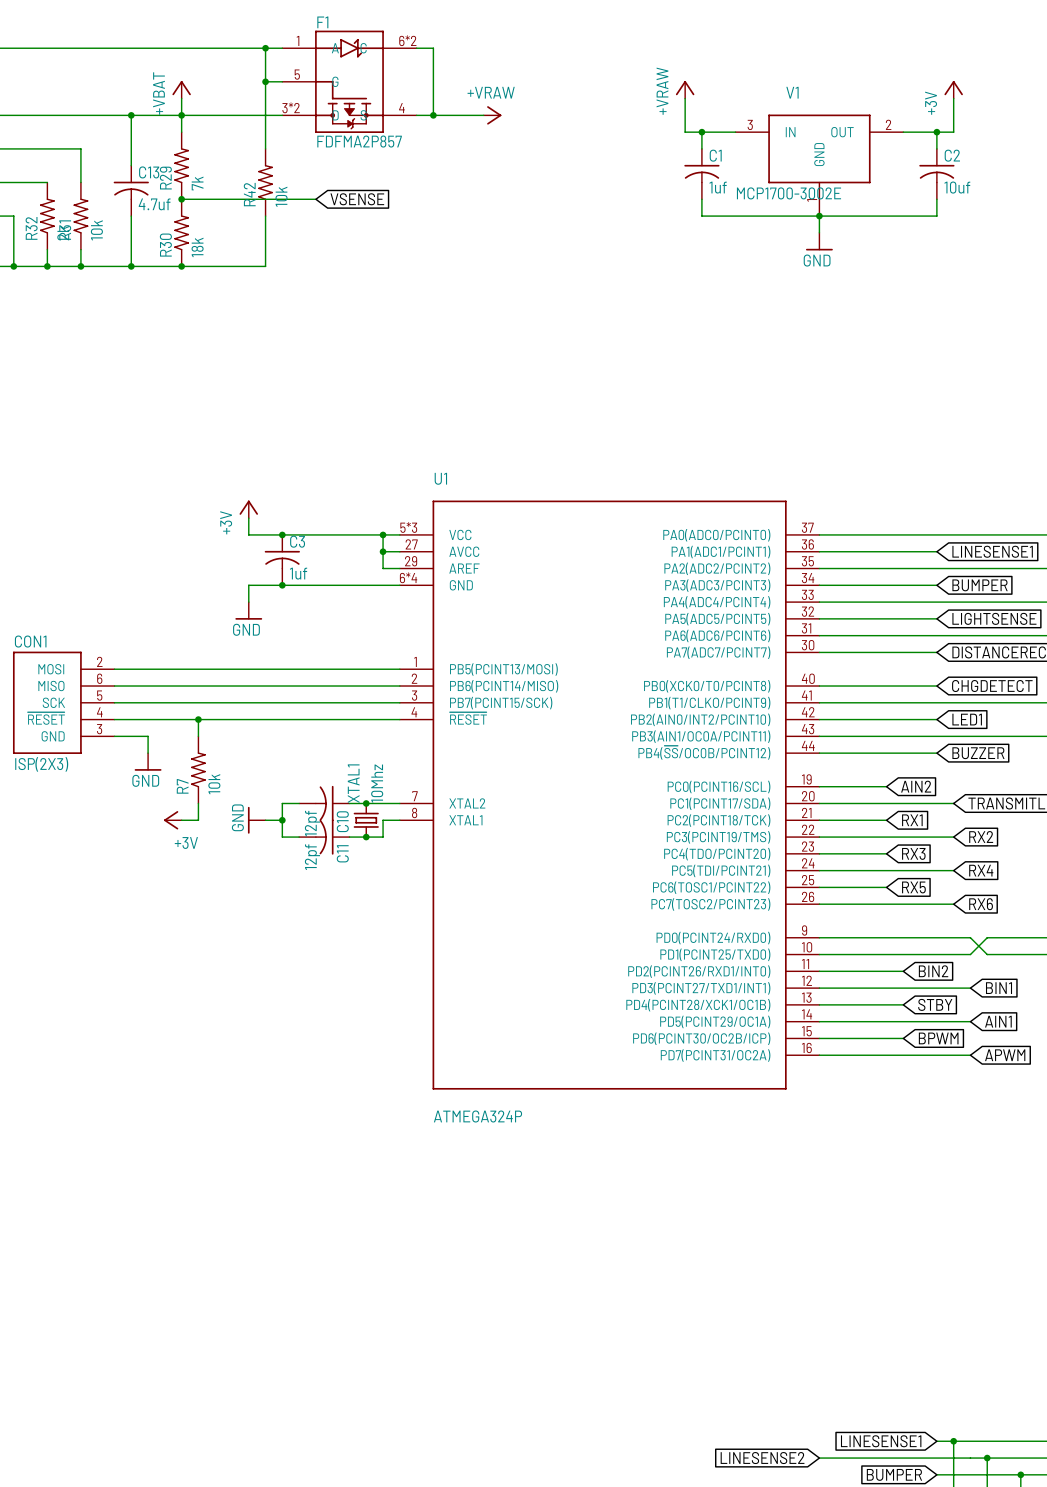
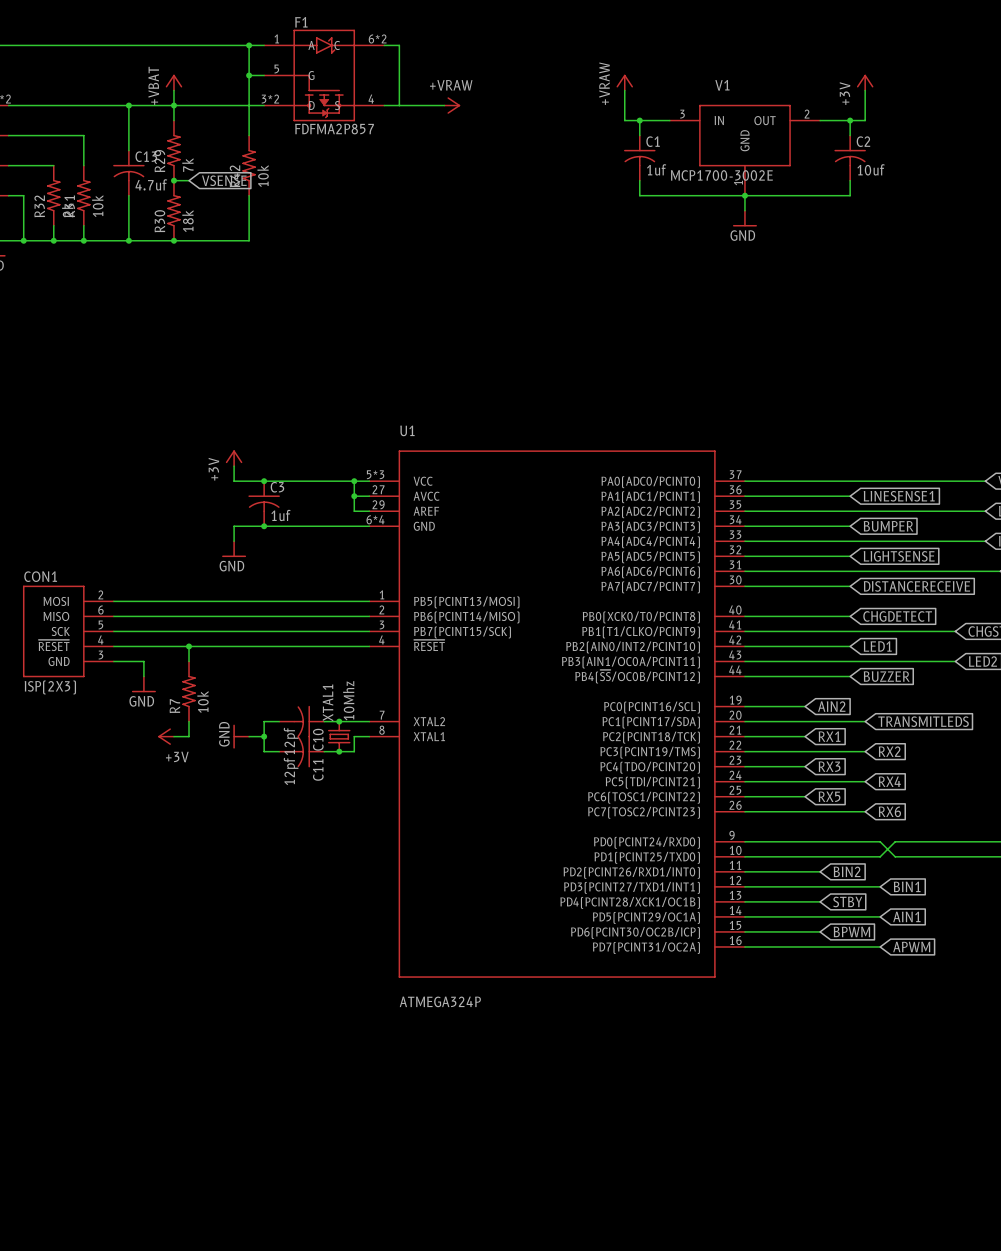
junction: (433, 115) -> none
wire: (198, 199) (315, 199) -> none
global label position: VSENSE (357, 199) -> VSENSE (224, 180)

